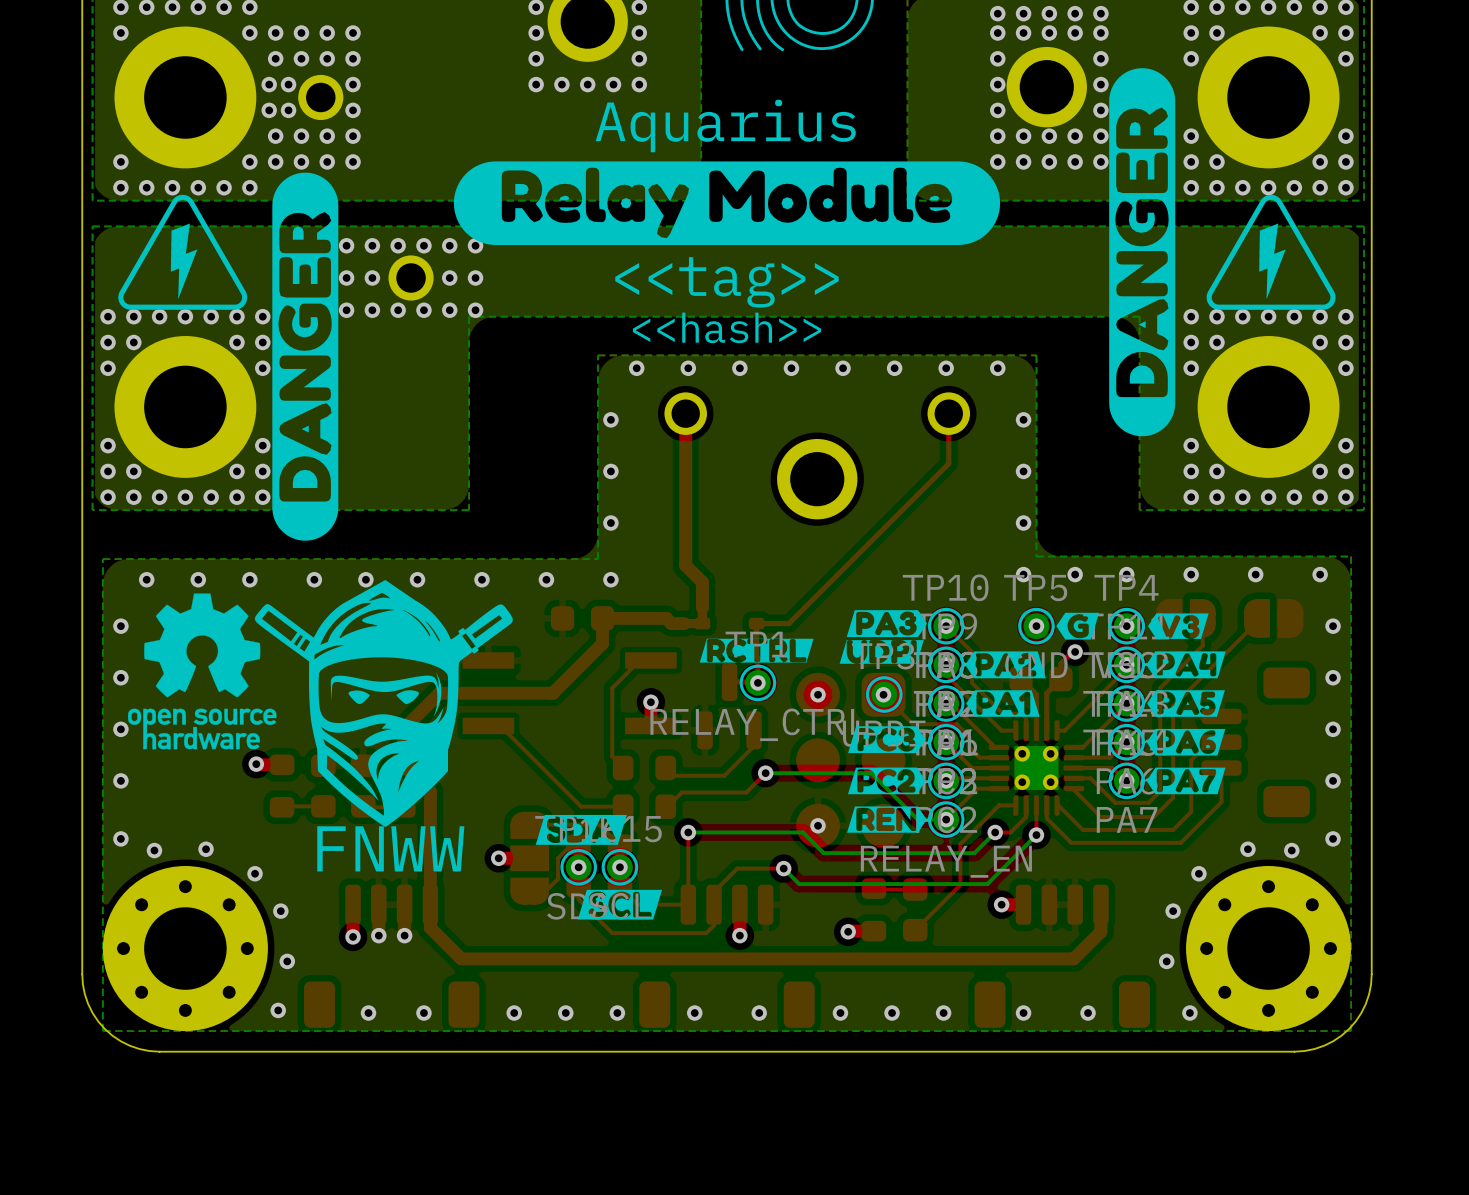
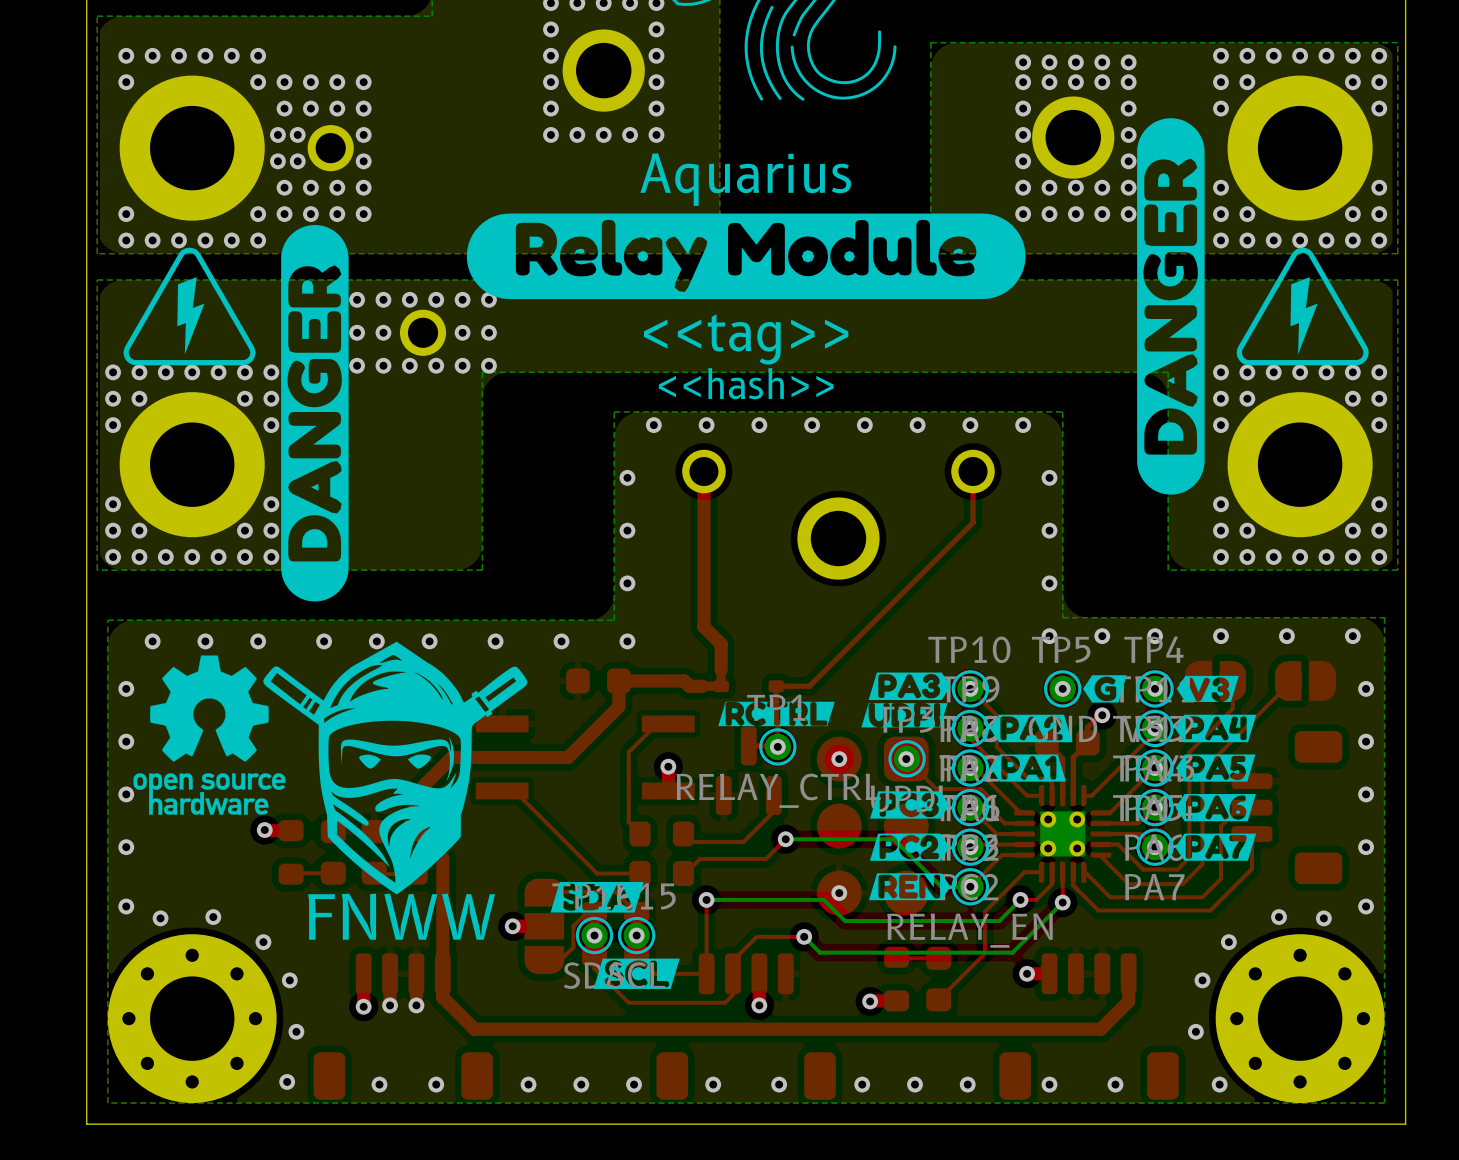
board edge: (82, 974) (88, 1003) (104, 1029) (130, 1045) (159, 1051) -> (86, 1045) (86, 1124) (165, 1124)
board edge: (1371, 974) (1365, 1003) (1349, 1029) (1323, 1045) (1294, 1051) -> (1405, 1045) (1405, 1124) (1326, 1124)

